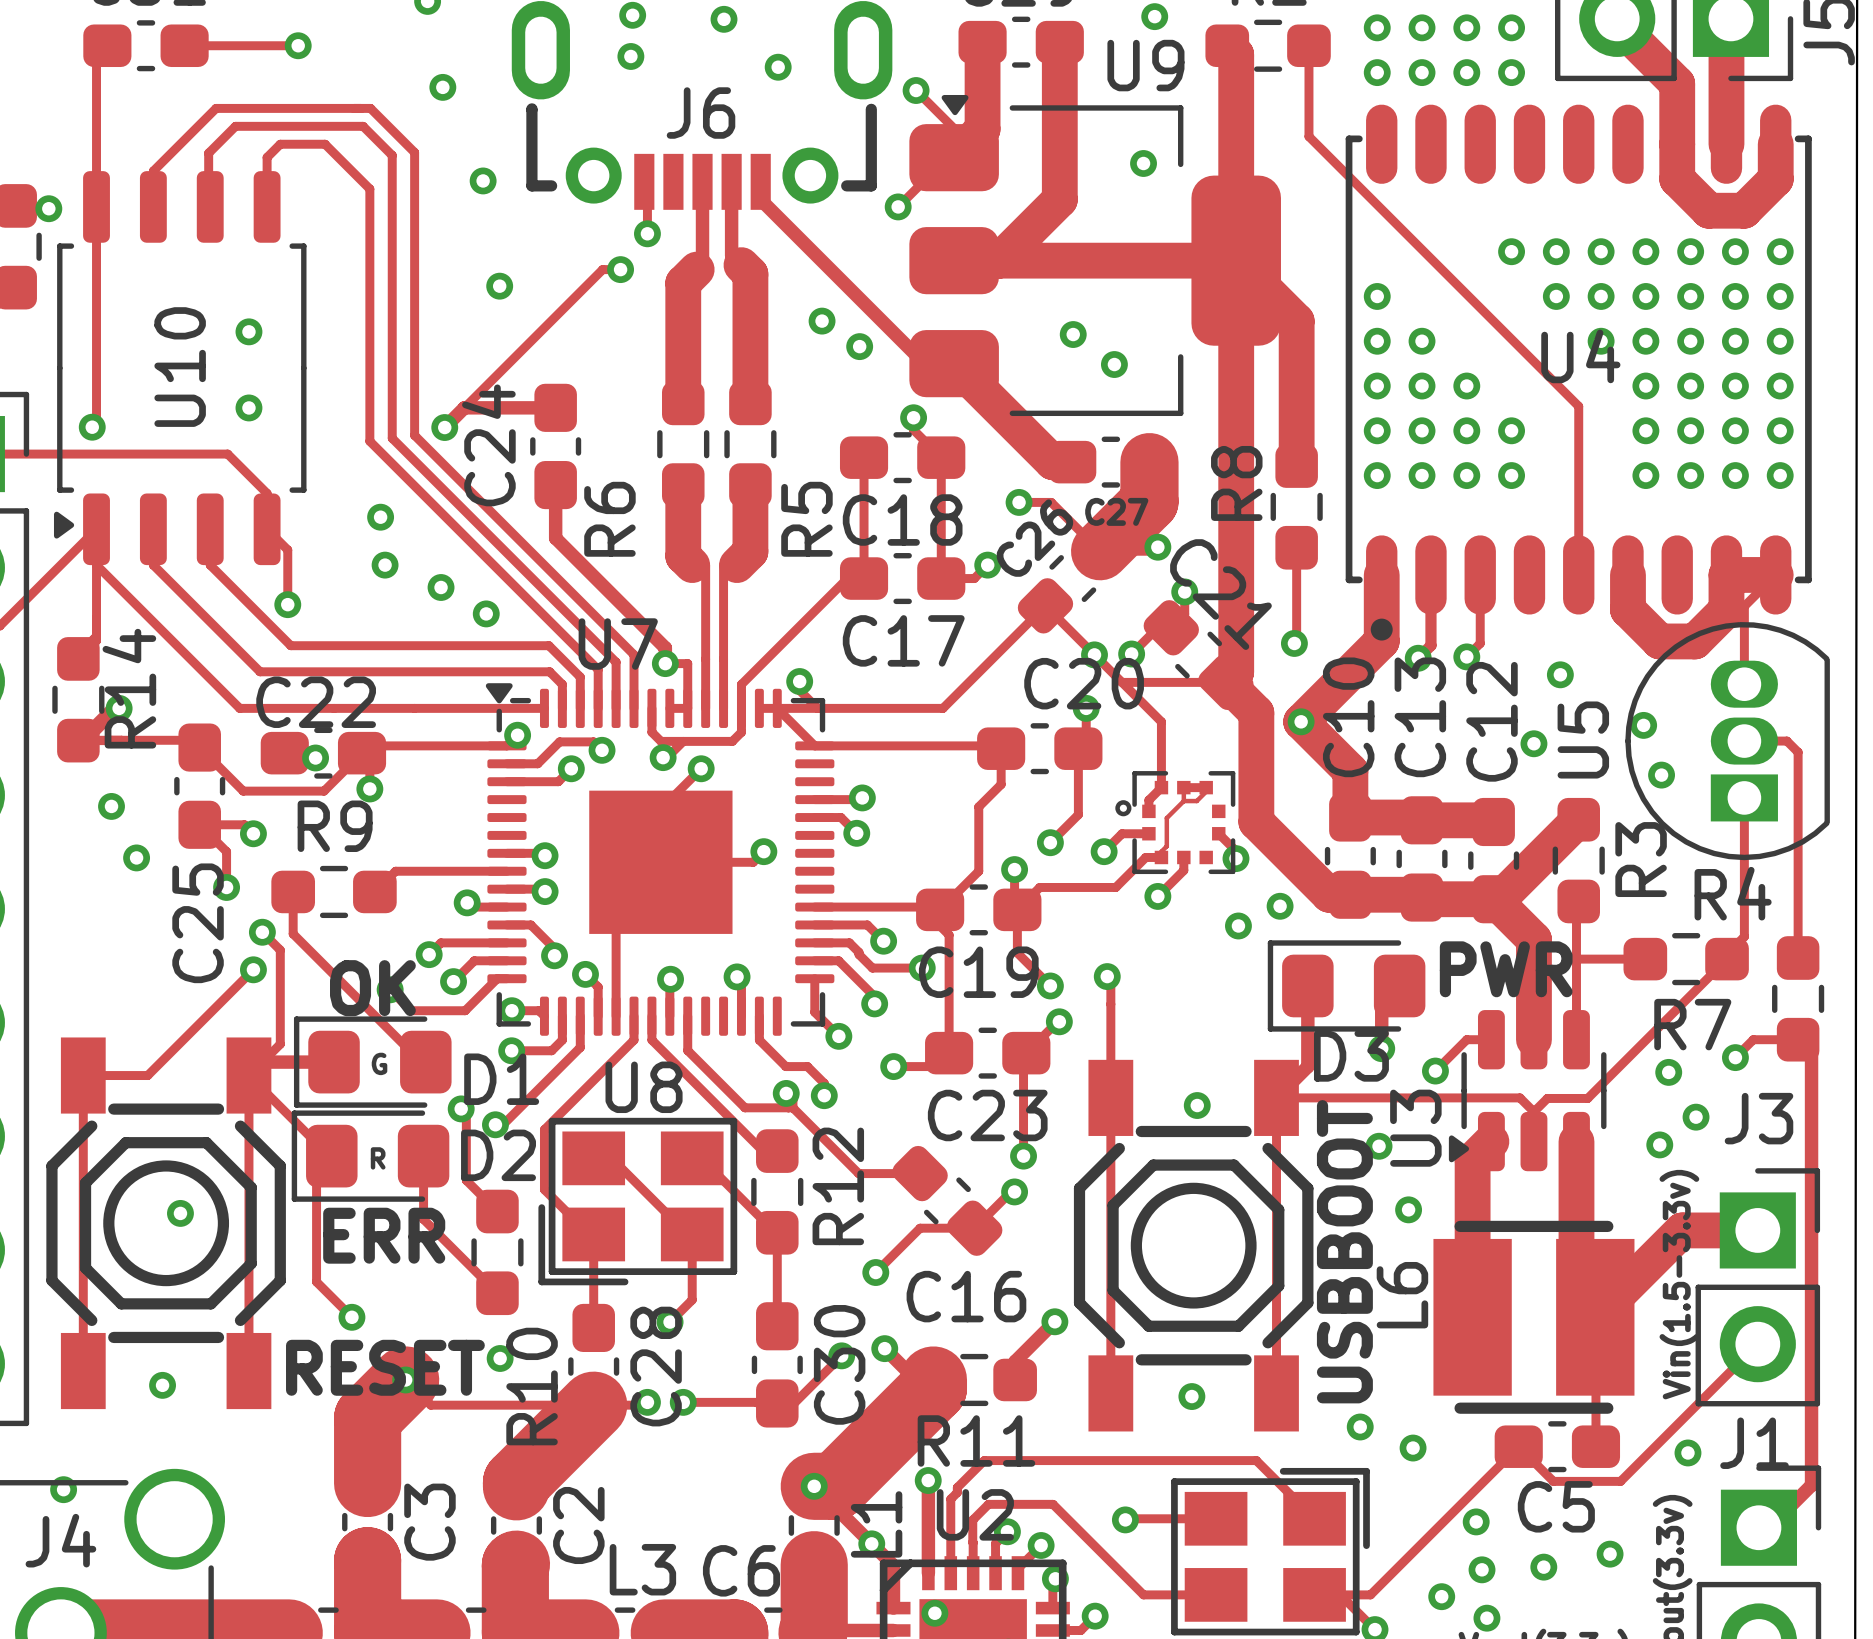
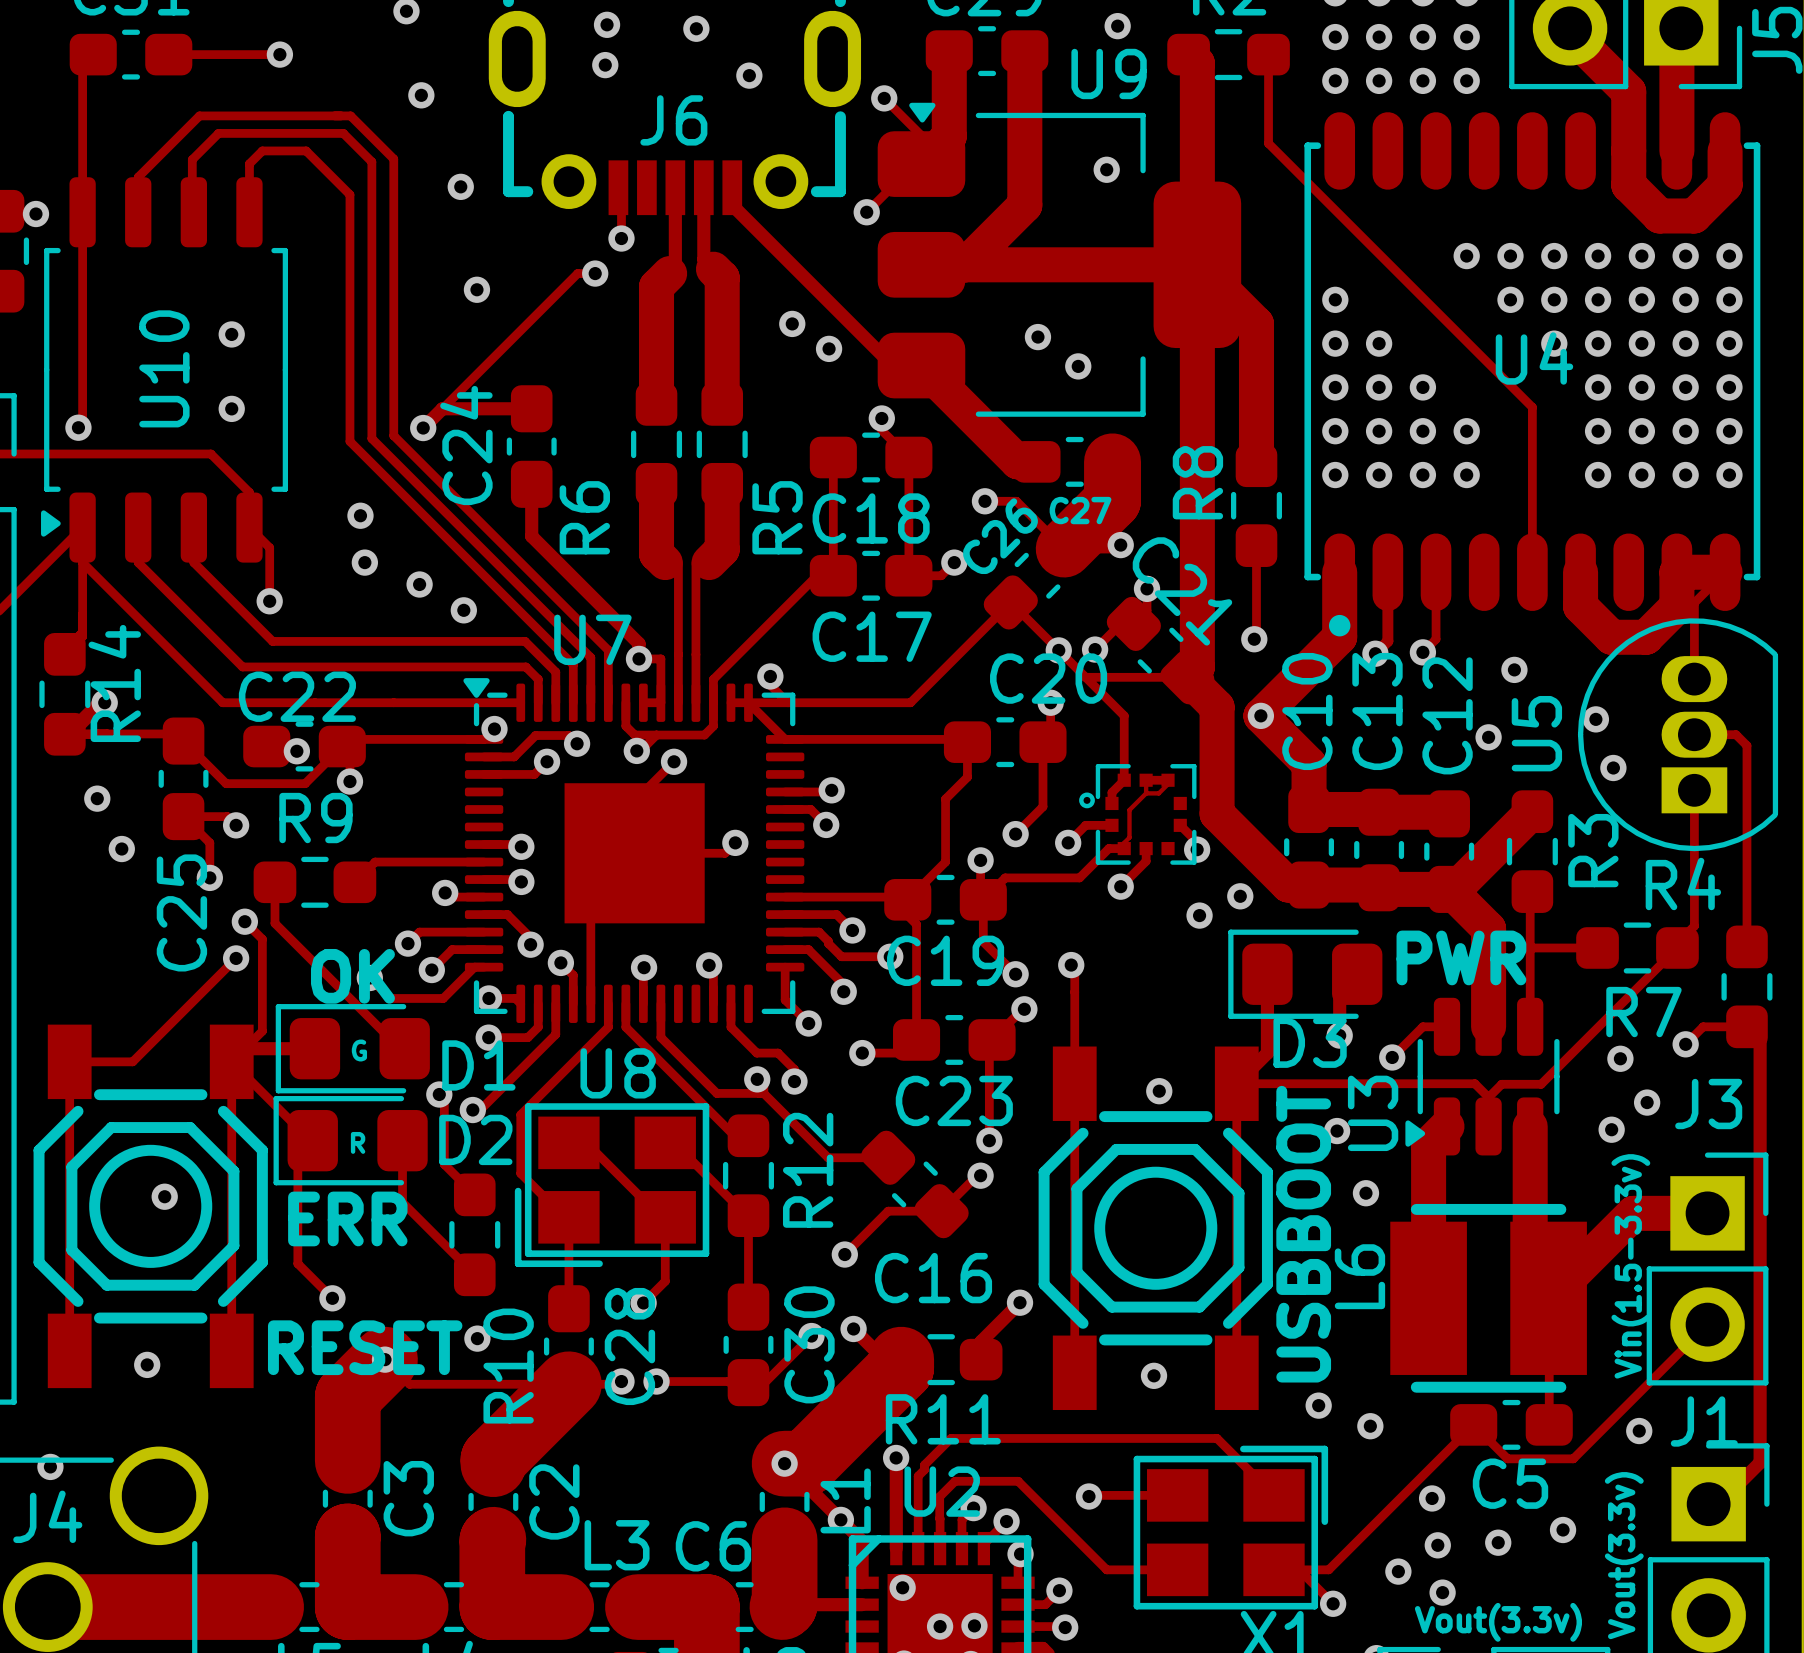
text position: ERR (384, 1235) -> ERR (347, 1218)

